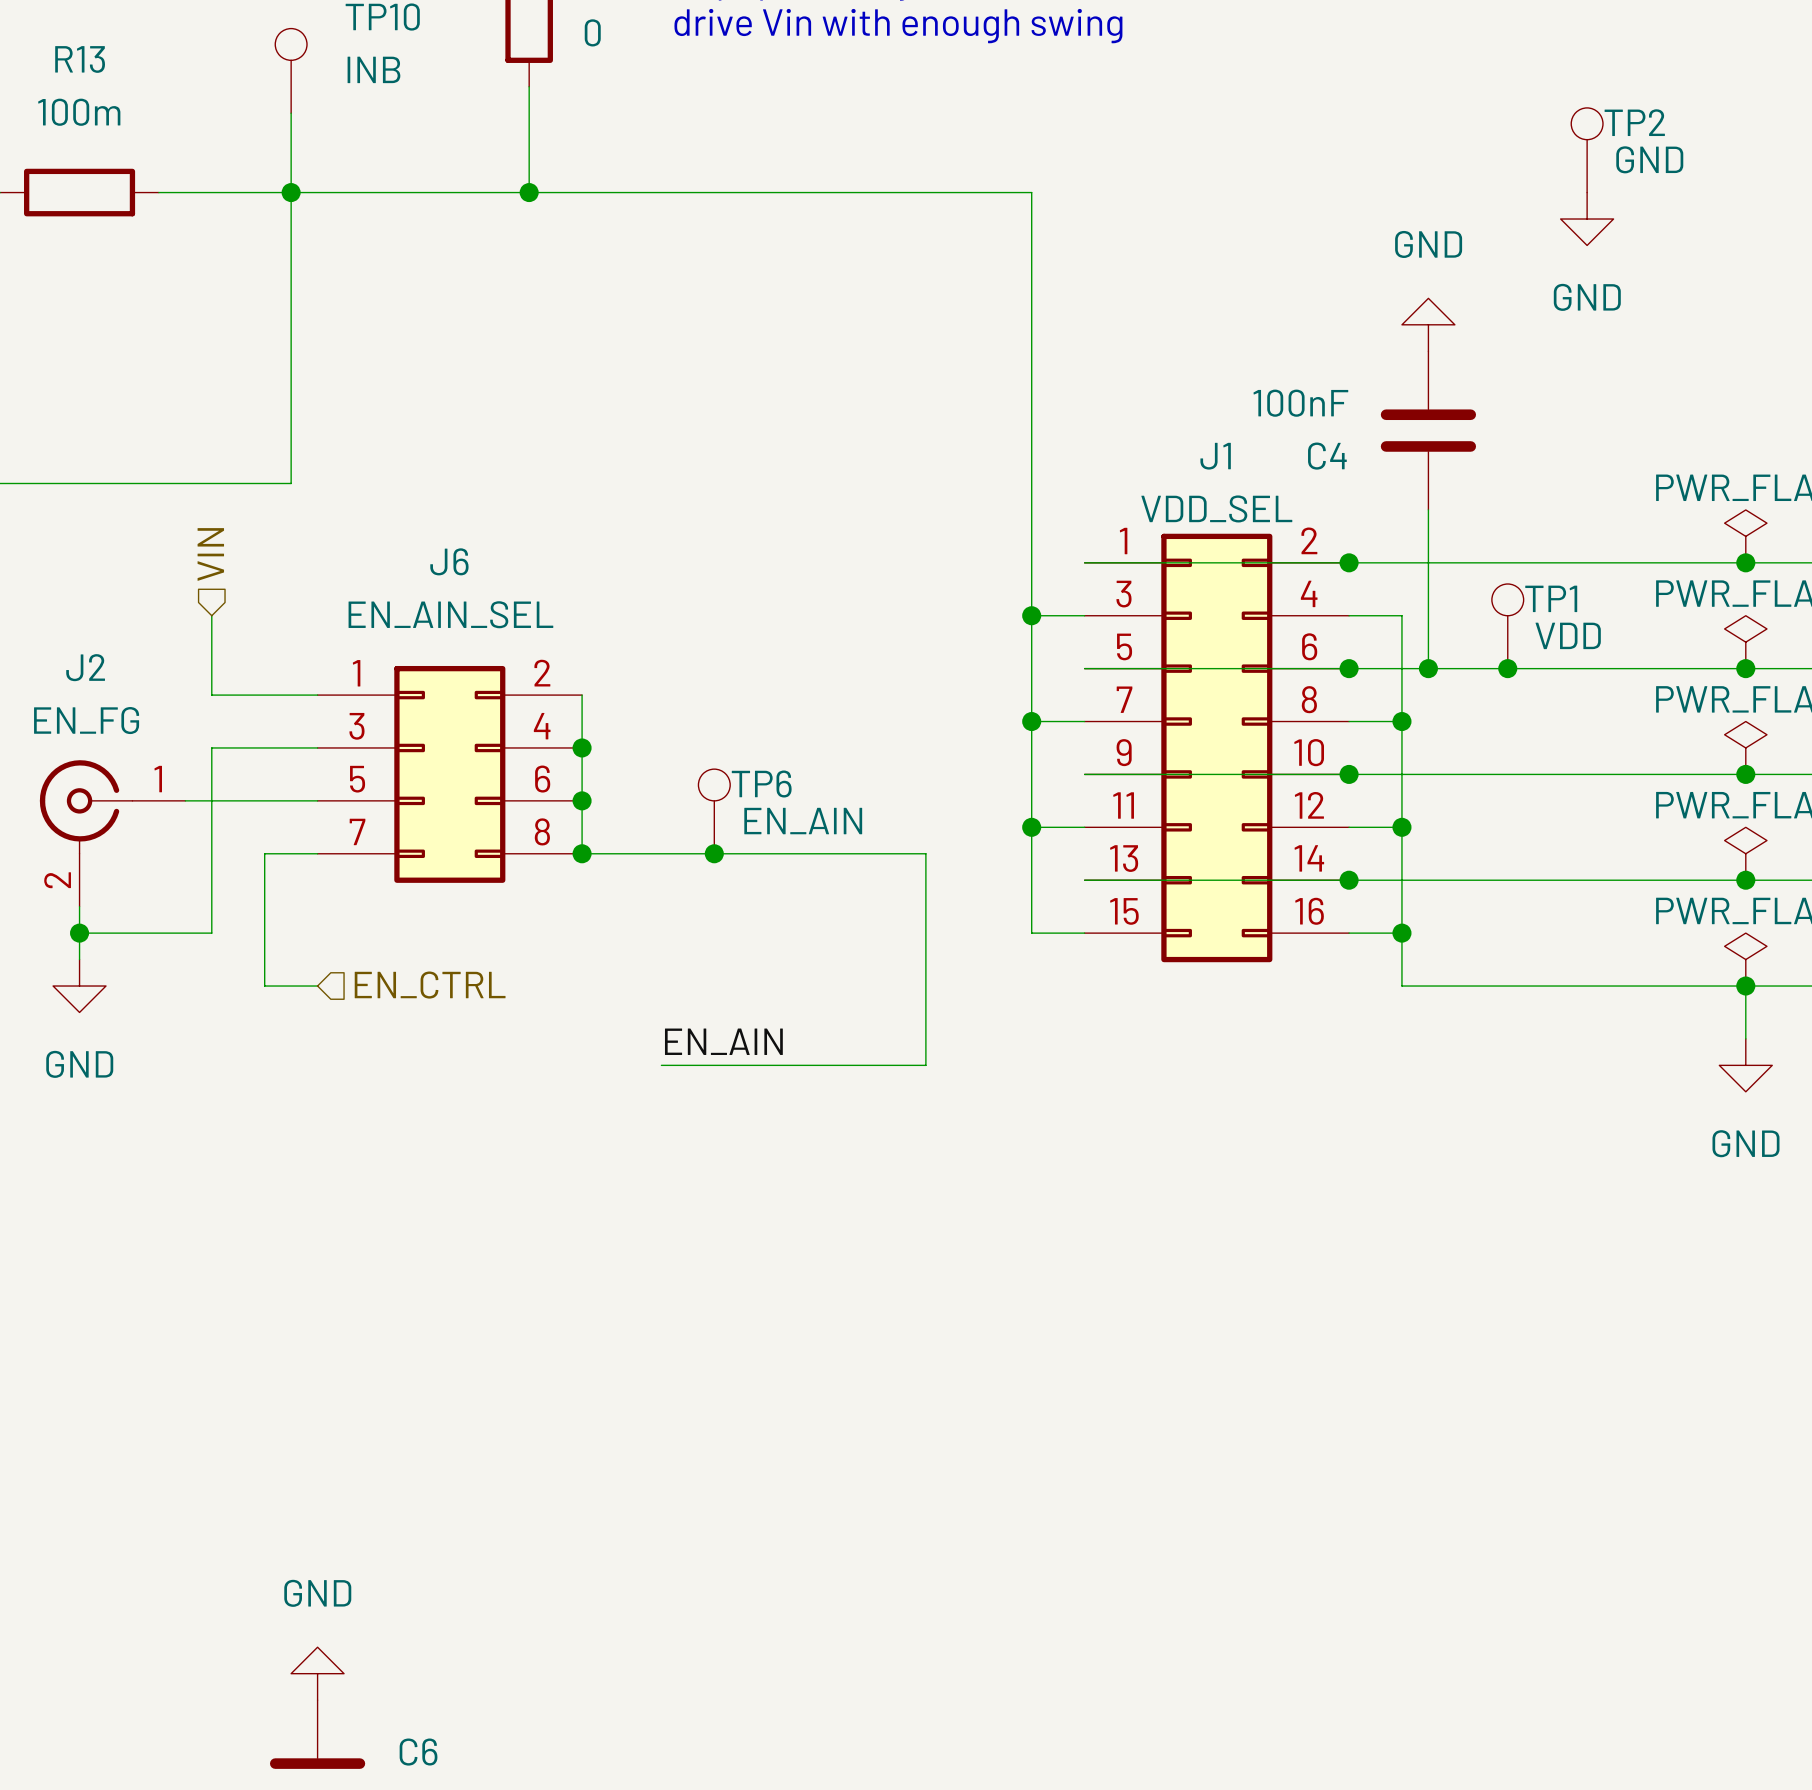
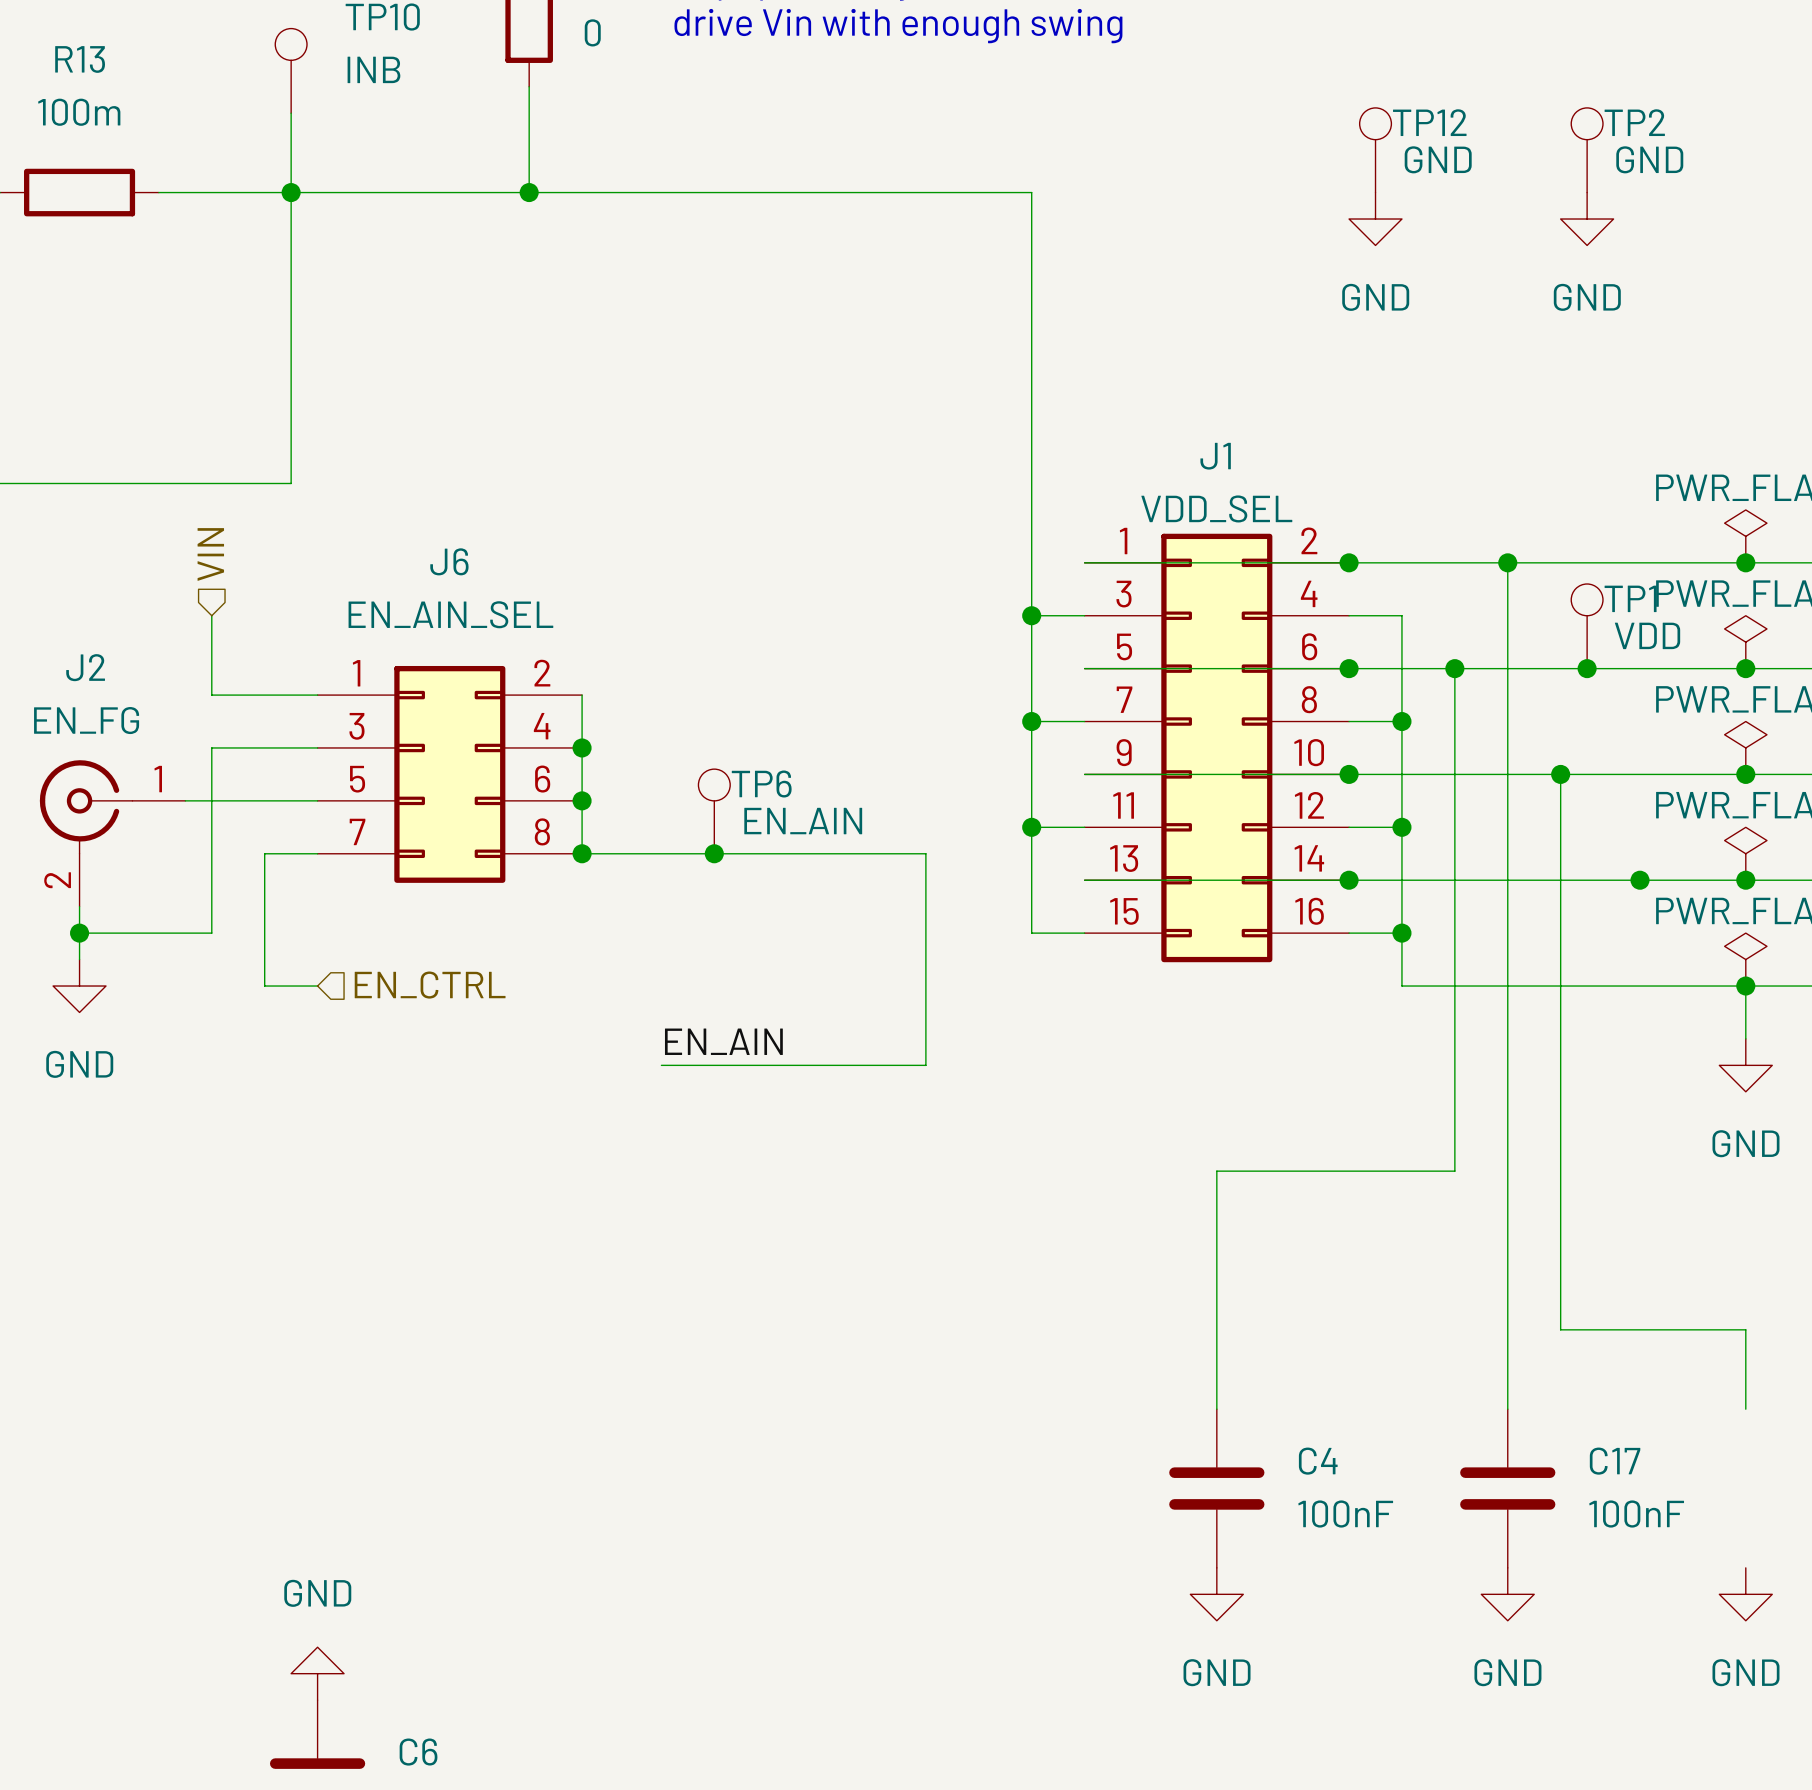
TP12: none -> GND (1375, 150)
power symbol rotation: 0° (1428, 324) -> 180° (1375, 219)
power symbol position: GND (1428, 324) -> GND (1375, 219)
C4 value position: 100nF (1300, 403) -> 100nF (1345, 1514)
C4 position: (1428, 430) -> (1216, 1488)
C4 name position: C4 (1327, 456) -> C4 (1318, 1461)
wire: (1428, 509) (1428, 668) -> none
wire: none -> (1507, 562) (1507, 1409)
junction: none -> (1507, 562)
TP1 position: (1507, 626) -> (1587, 626)
junction: (1428, 668) -> none
wire: none -> (1454, 668) (1454, 1171) (1216, 1171) (1216, 1409)
junction: none -> (1454, 668)
junction: (1507, 668) -> none
junction: none -> (1587, 668)
wire: none -> (1560, 774) (1560, 1329) (1745, 1329) (1745, 1409)
junction: none -> (1560, 774)
junction: none -> (1640, 880)
C17: none -> 100nF (1507, 1488)
power symbol: none -> GND (1216, 1594)
power symbol: none -> GND (1507, 1594)
power symbol: none -> GND (1745, 1594)

